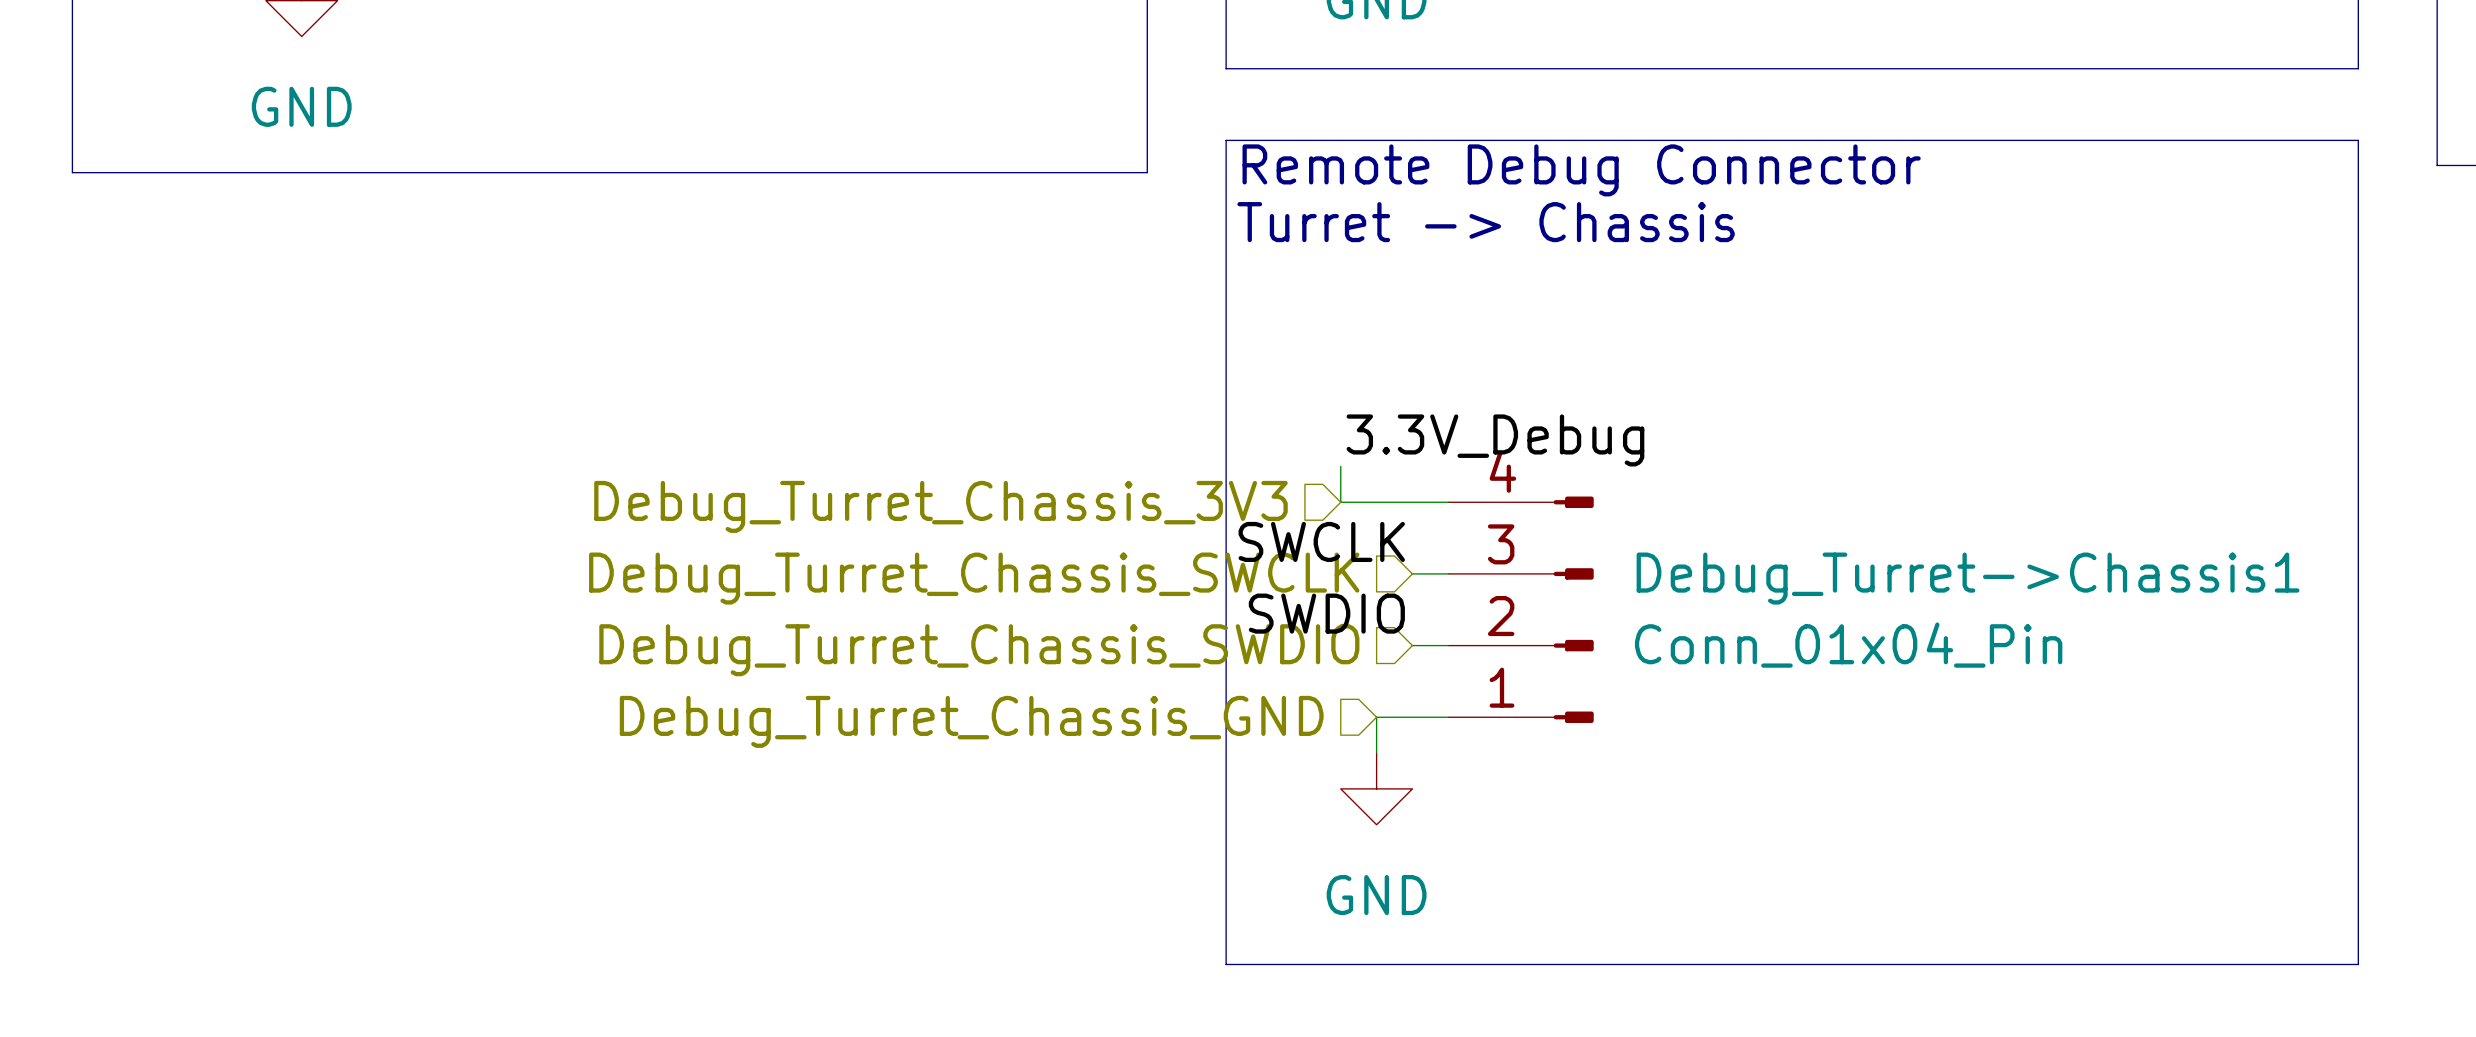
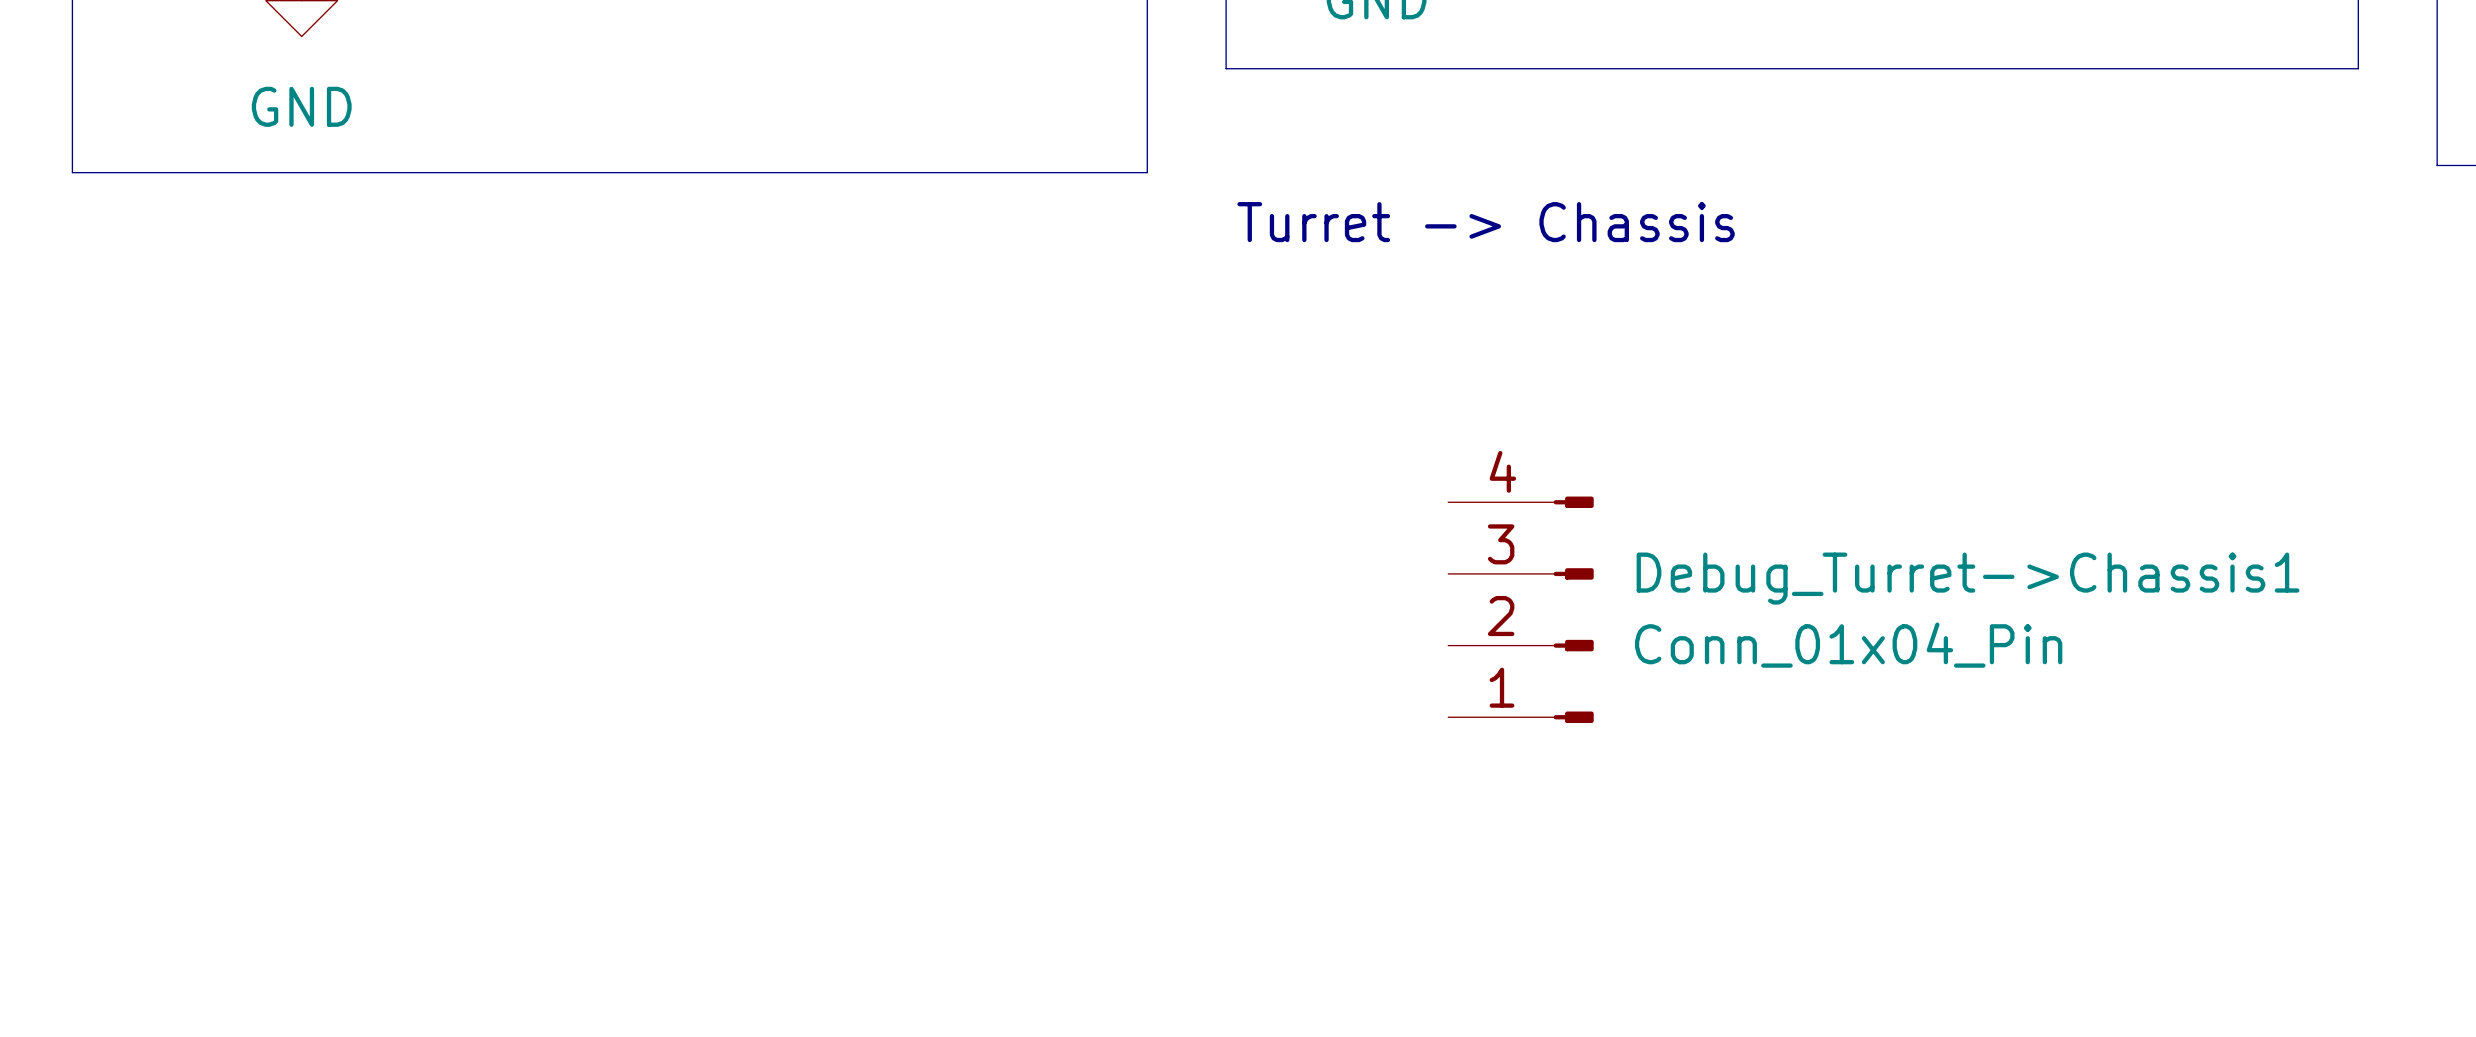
line: (1226, 140) (1226, 964) (2358, 964) (2358, 140) (1226, 140) -> none
text: Remote Debug Connector (1581, 170) -> none
label: 3.3V_Debug (1495, 440) -> none
wire: (1340, 466) (1340, 502) (1448, 502) -> none
hierarchical label: Debug_Turret_Chassis_3V3 (940, 506) -> none
label: SWCLK (1321, 541) -> none
wire: (1412, 573) (1448, 573) -> none
hierarchical label: Debug_Turret_Chassis_SWCLK (974, 578) -> none
label: SWDIO (1326, 613) -> none
wire: (1412, 645) (1448, 645) -> none
hierarchical label: Debug_Turret_Chassis_SWDIO (979, 650) -> none
wire: (1448, 717) (1376, 717) (1376, 753) -> none
hierarchical label: Debug_Turret_Chassis_GND (971, 721) -> none
power symbol: GND (1376, 788) -> none

